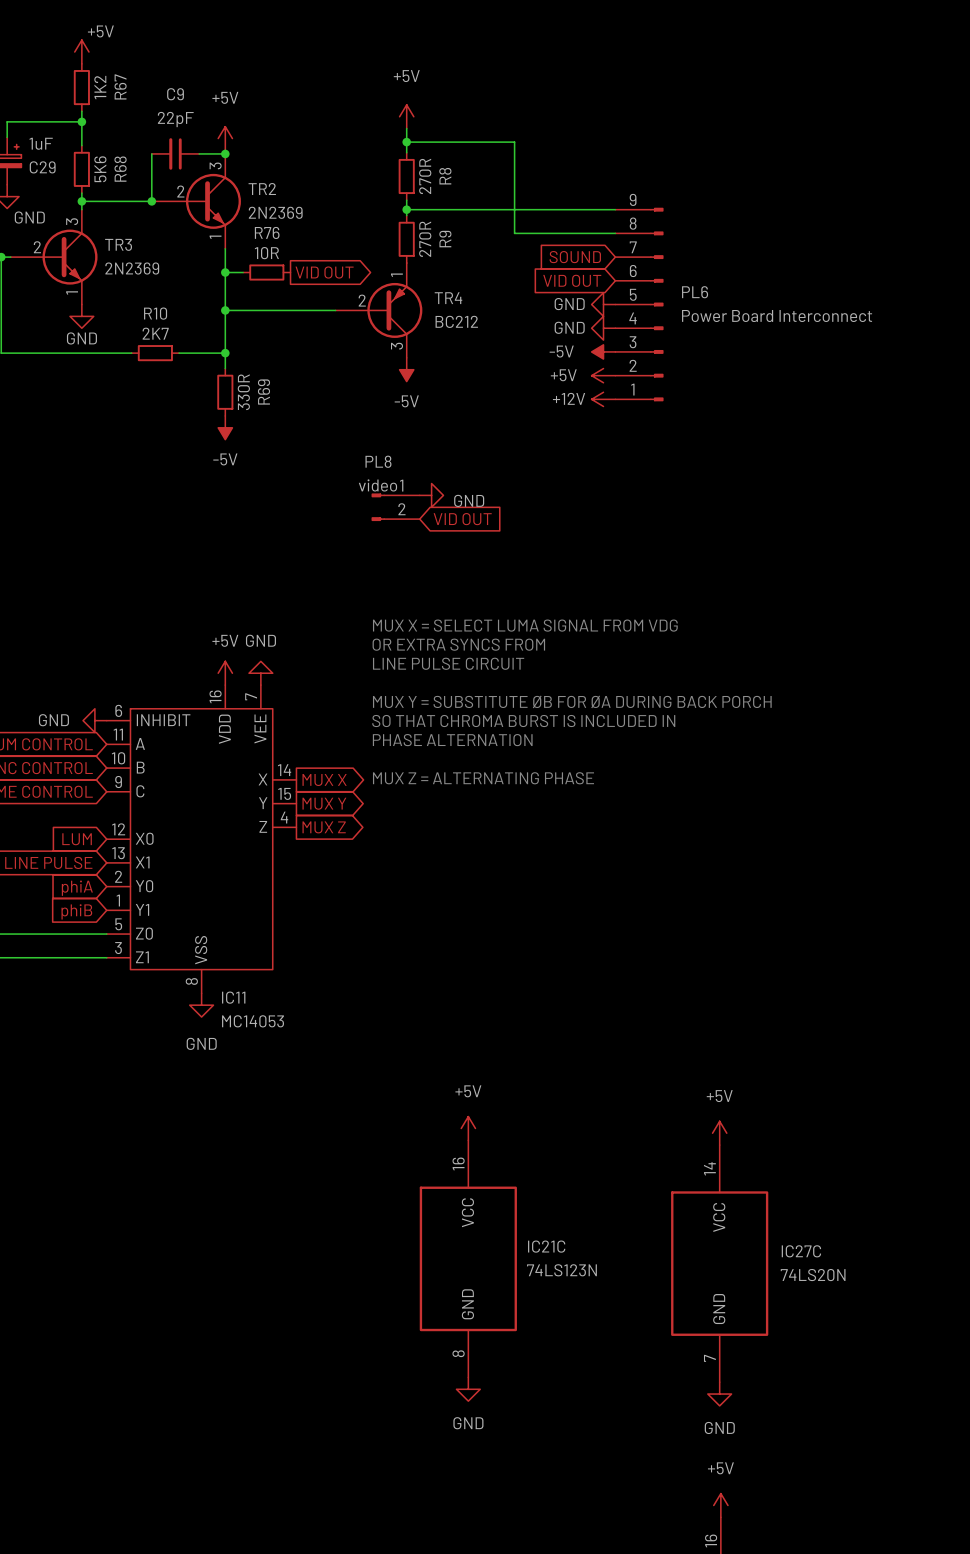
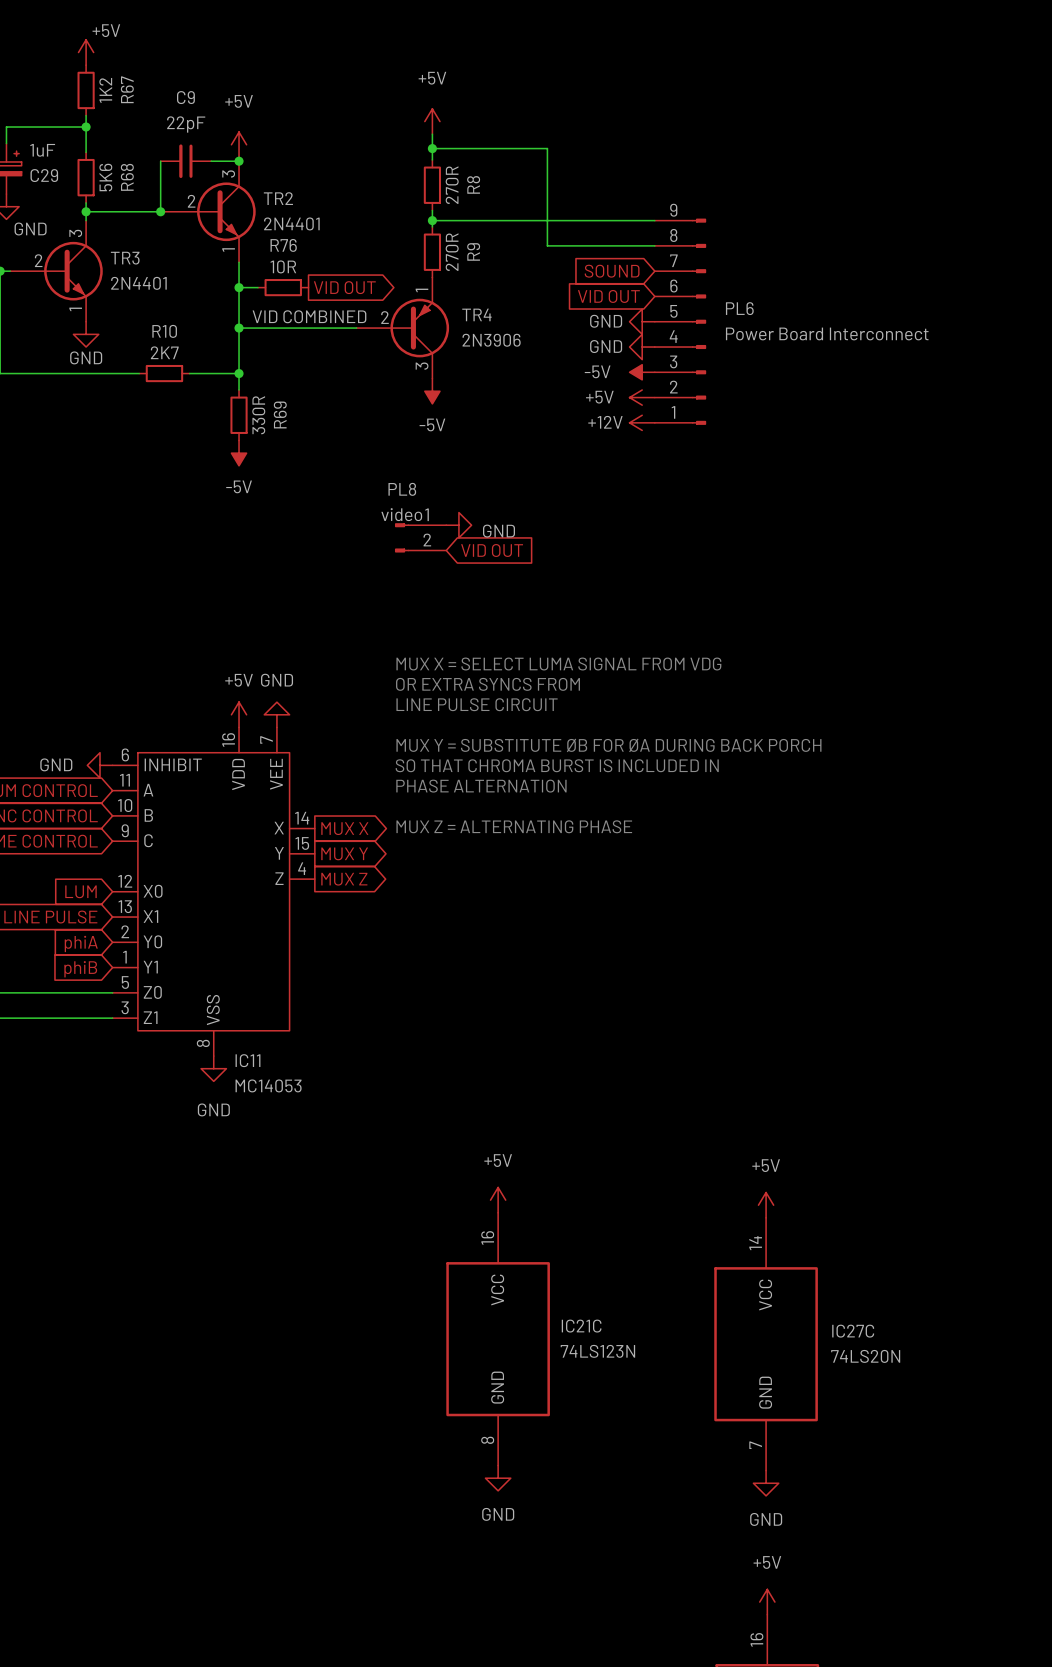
TR2 value: 2N2369 (275, 212) -> 2N4401 (291, 223)
TR3 value: 2N2369 (132, 268) -> 2N4401 (138, 283)
label: none -> VID COMBINED (309, 316)
TR4 value: BC212 (456, 321) -> 2N3906 (491, 340)

